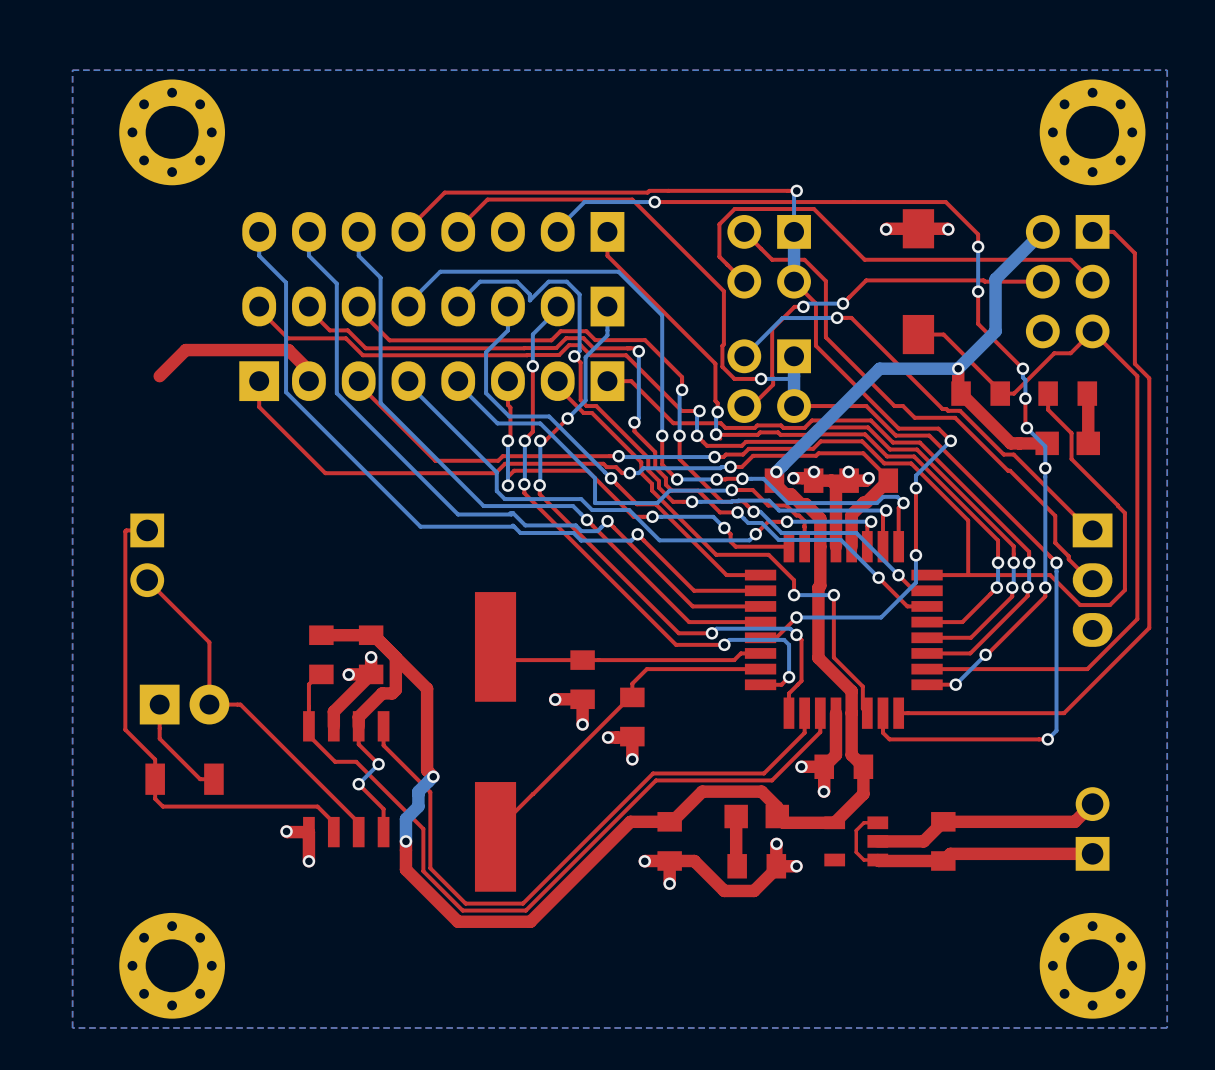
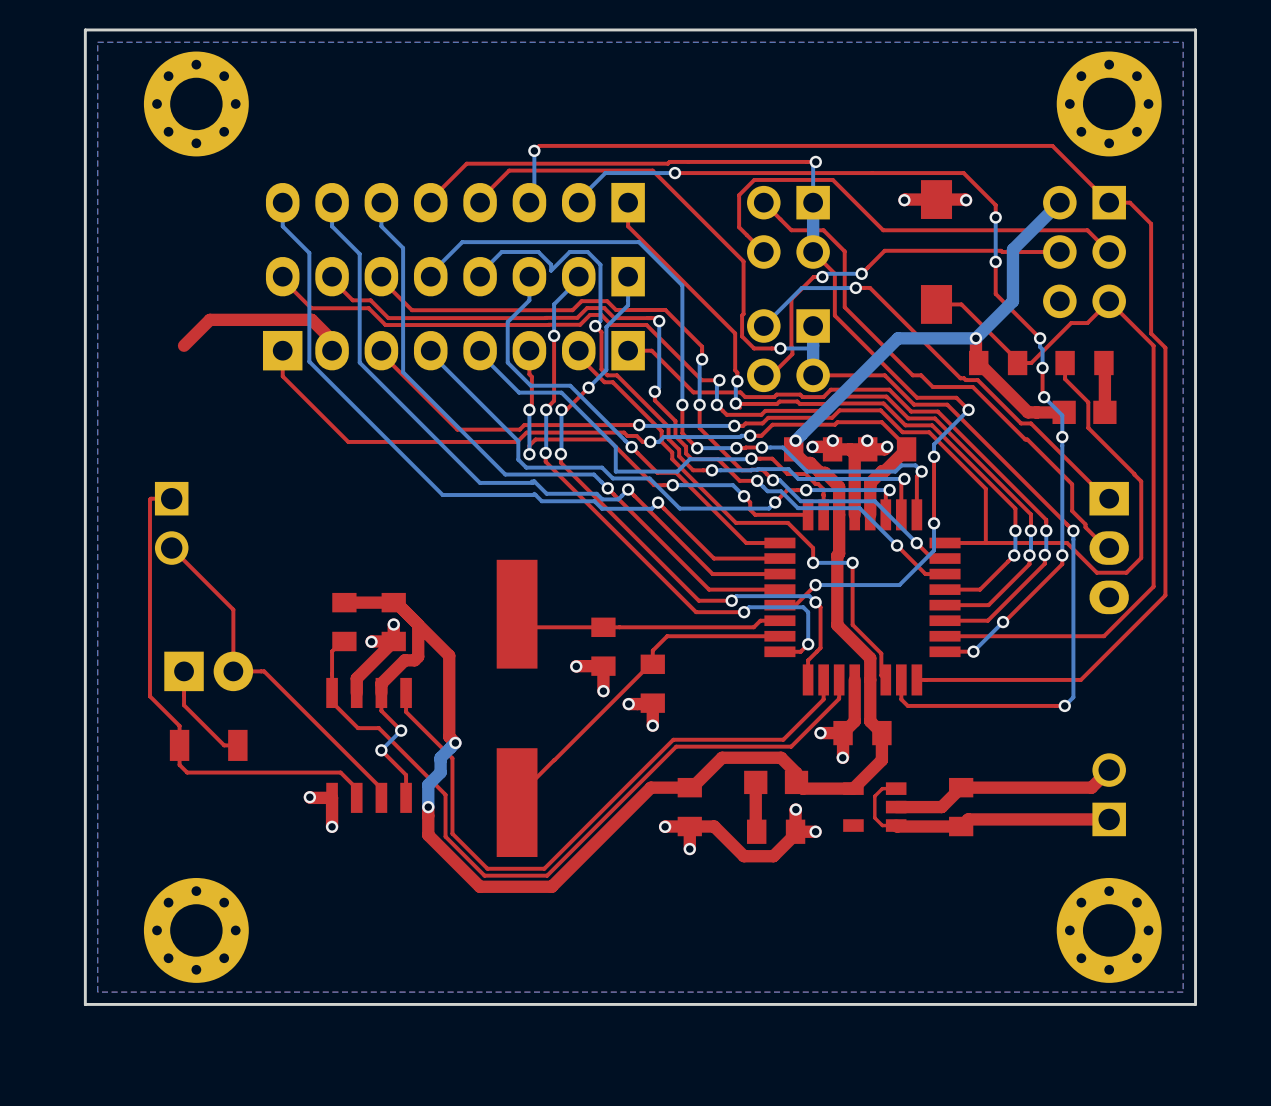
board edge: none -> (1195, 29) (85, 29) (85, 1004) (1195, 1004) (1195, 29)
top track: none -> (534, 150) (539, 145) (1052, 145) (1109, 202)
bottom track: none -> (534, 150) (534, 197) (529, 202)
via: none -> (534, 150)

